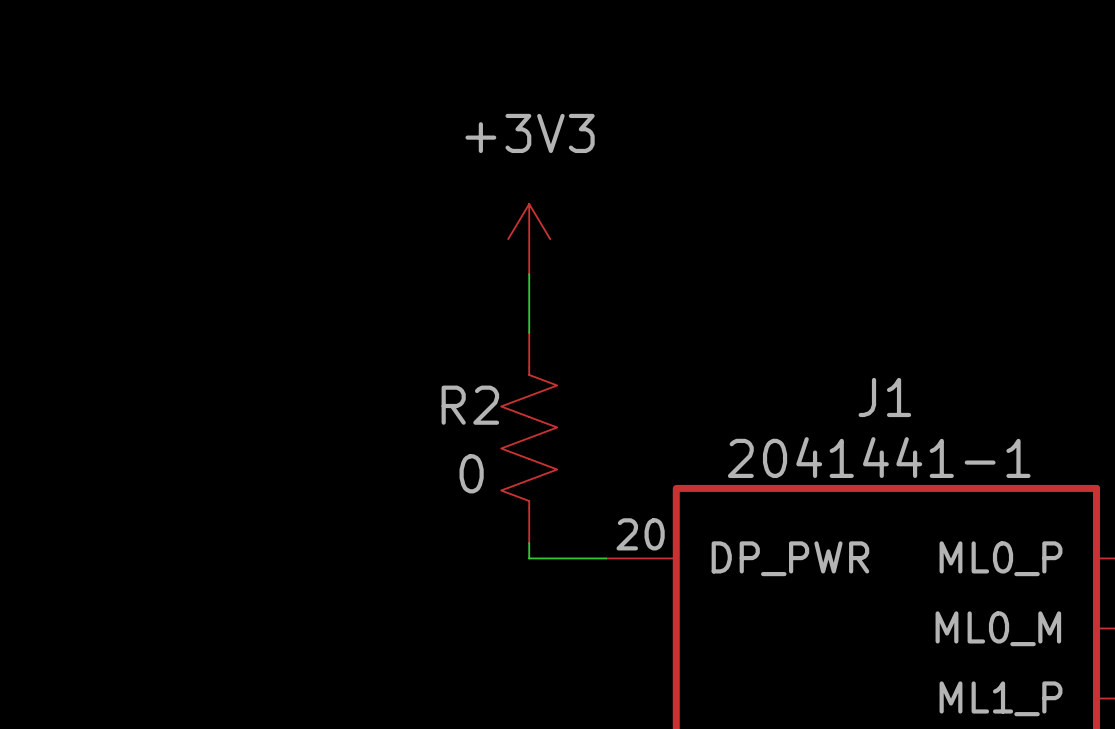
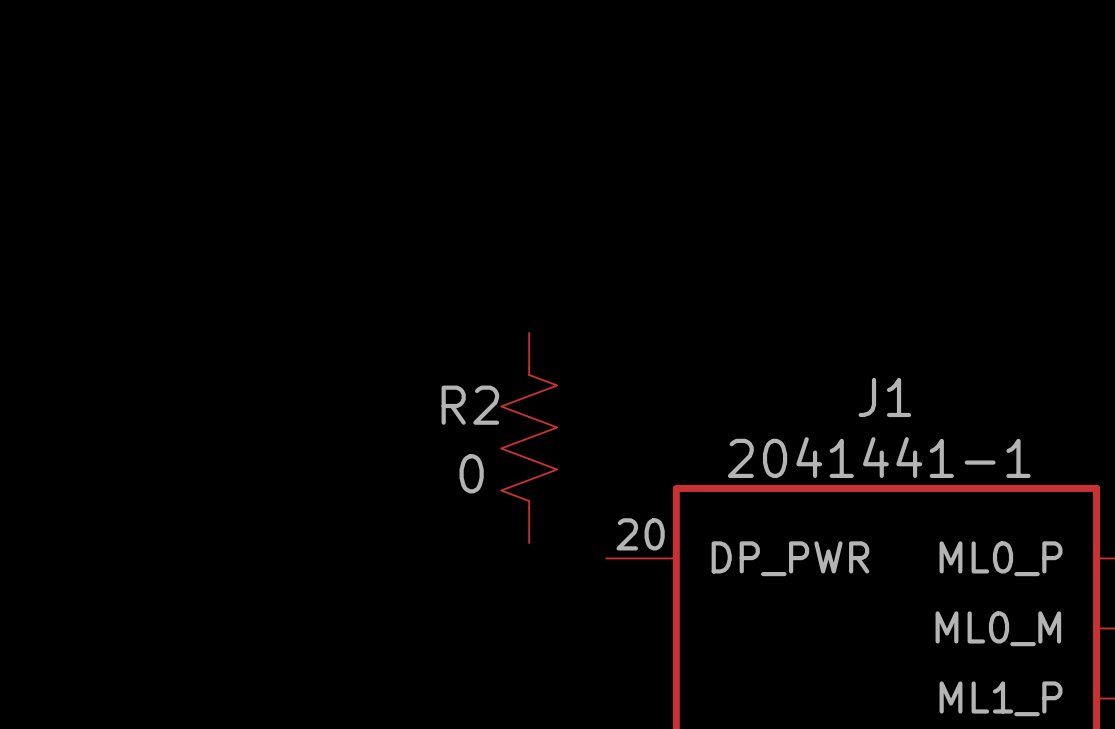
power symbol: +3V3 (529, 239) -> none
wire: (529, 274) (529, 332) -> none
wire: (529, 543) (529, 558) (606, 558) -> none

